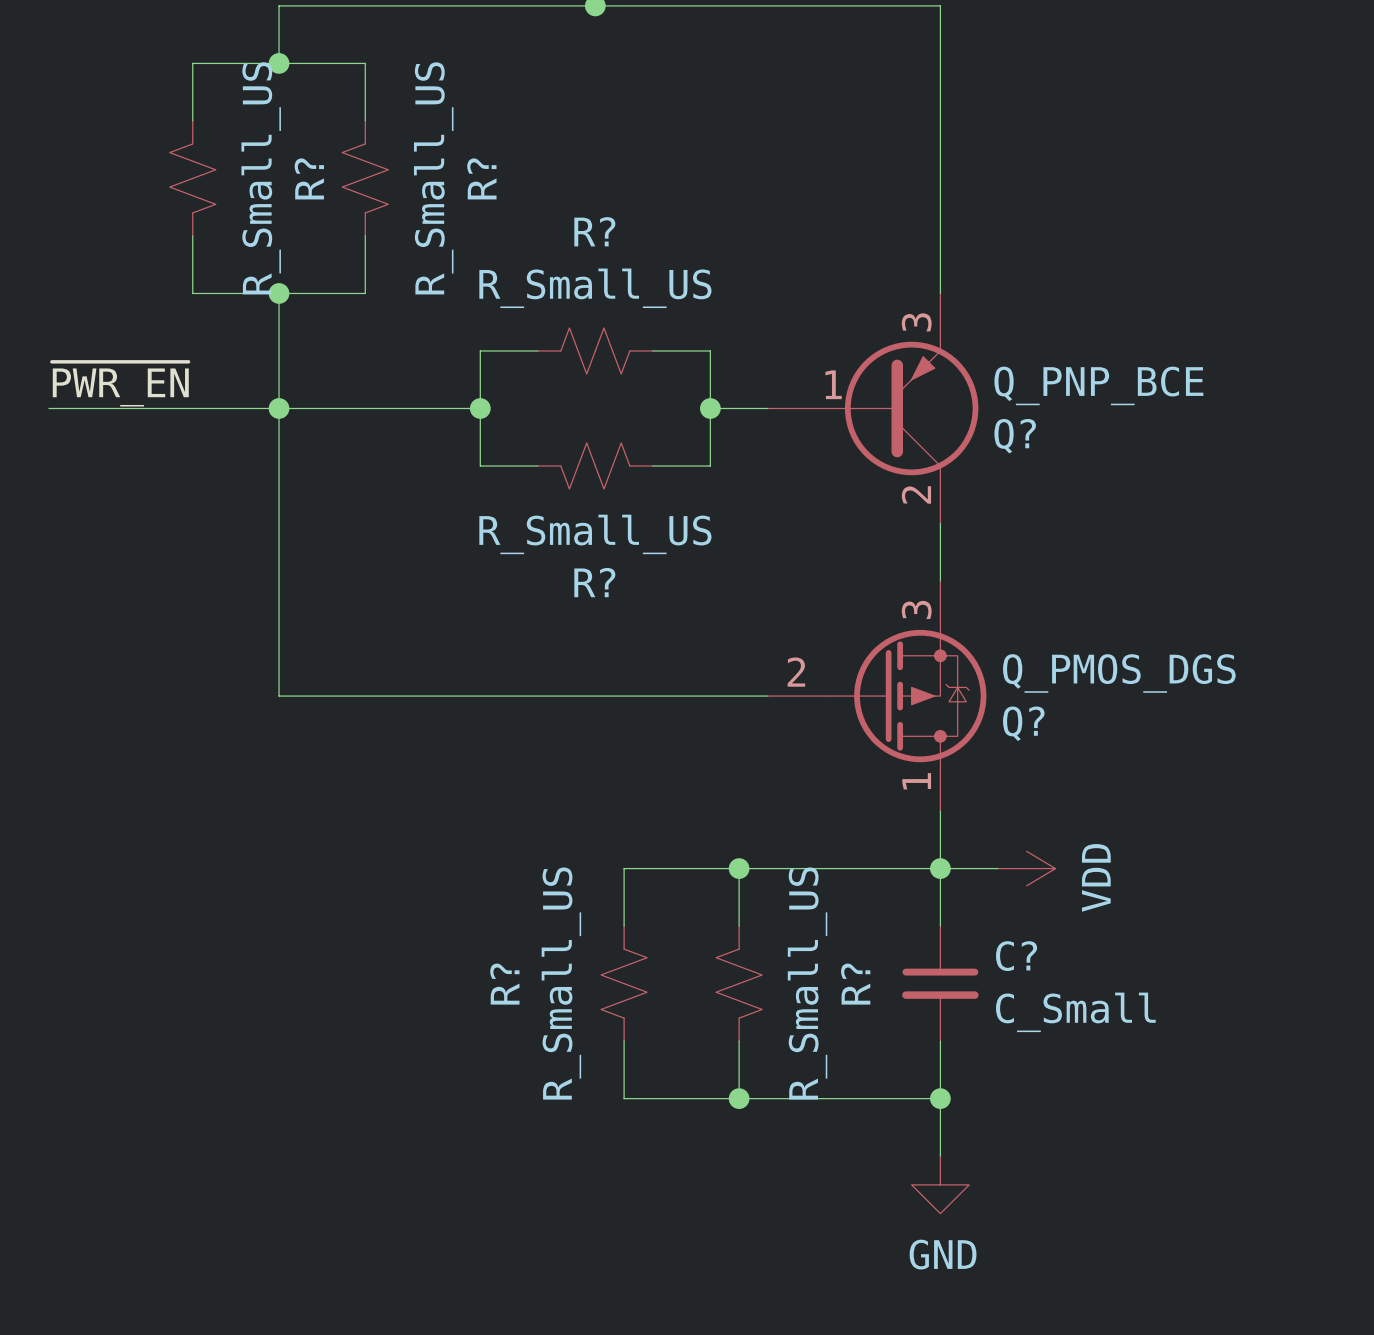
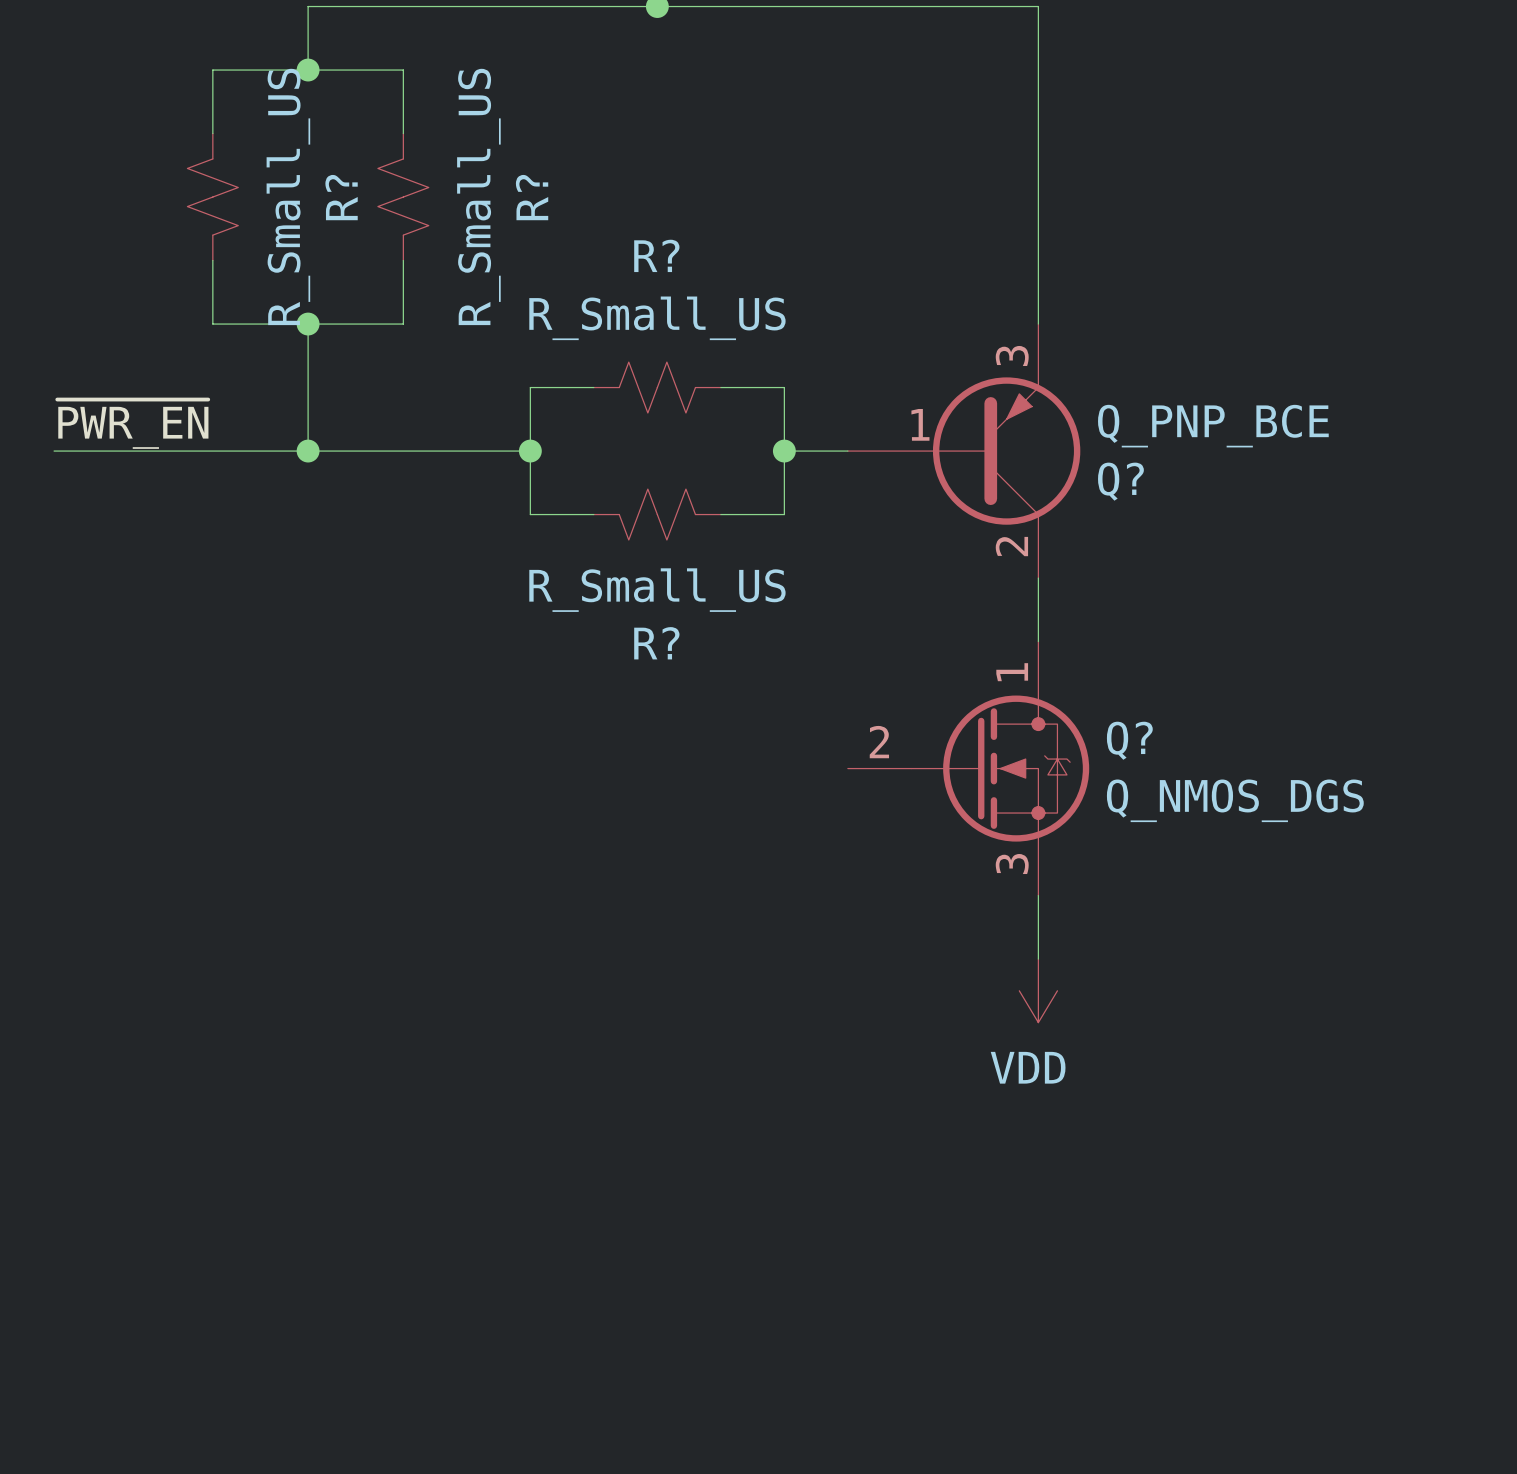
wire: (279, 408) (279, 696) (767, 696) -> none
Q? symbol: [767, 581, 987, 812] -> [847, 641, 1090, 896]
Q? value: Q_PMOS_DGS (1119, 673) -> Q_NMOS_DGS (1235, 800)
Q? name position: Q? (1023, 723) -> Q? (1129, 740)
wire: (739, 868) (739, 926) -> none
junction: (739, 868) -> none
junction: (940, 868) -> none
wire: (997, 868) (624, 868) (624, 926) -> none
power symbol rotation: 0° (1026, 868) -> 90° clockwise (1038, 990)
power symbol position: VDD (1026, 868) -> VDD (1038, 990)
R?: R_Small_US (624, 983) -> none
R?: R_Small_US (739, 983) -> none
C?: C_Small (940, 983) -> none
wire: (624, 1041) (624, 1098) (940, 1098) -> none
wire: (739, 1041) (739, 1098) -> none
wire: (940, 1041) (940, 1156) -> none
junction: (739, 1098) -> none
junction: (940, 1098) -> none
power symbol: GND (940, 1184) -> none

